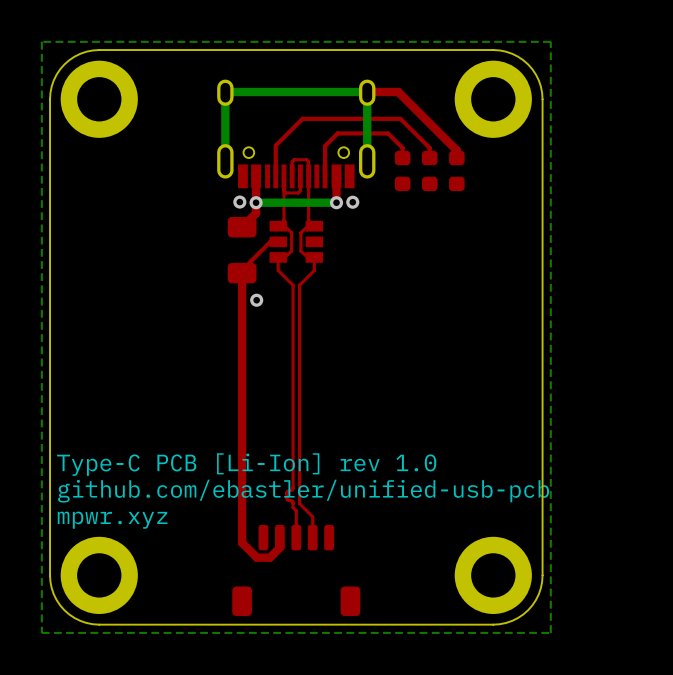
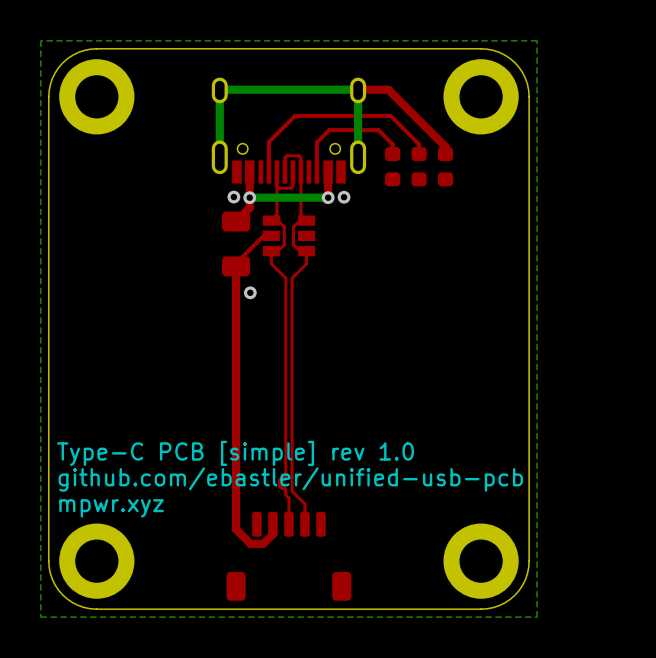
text: Type-C PCB [Li-Ion] rev 1.0 (246, 464) -> Type-C PCB [simple] rev 1.0 (235, 453)

